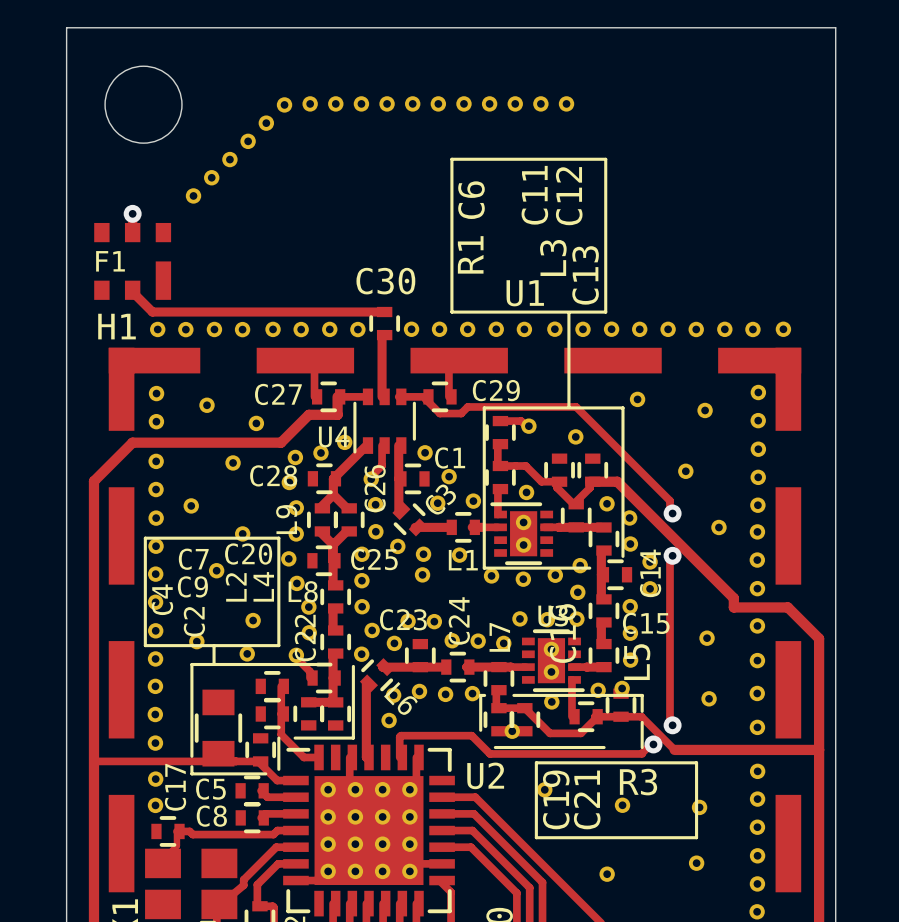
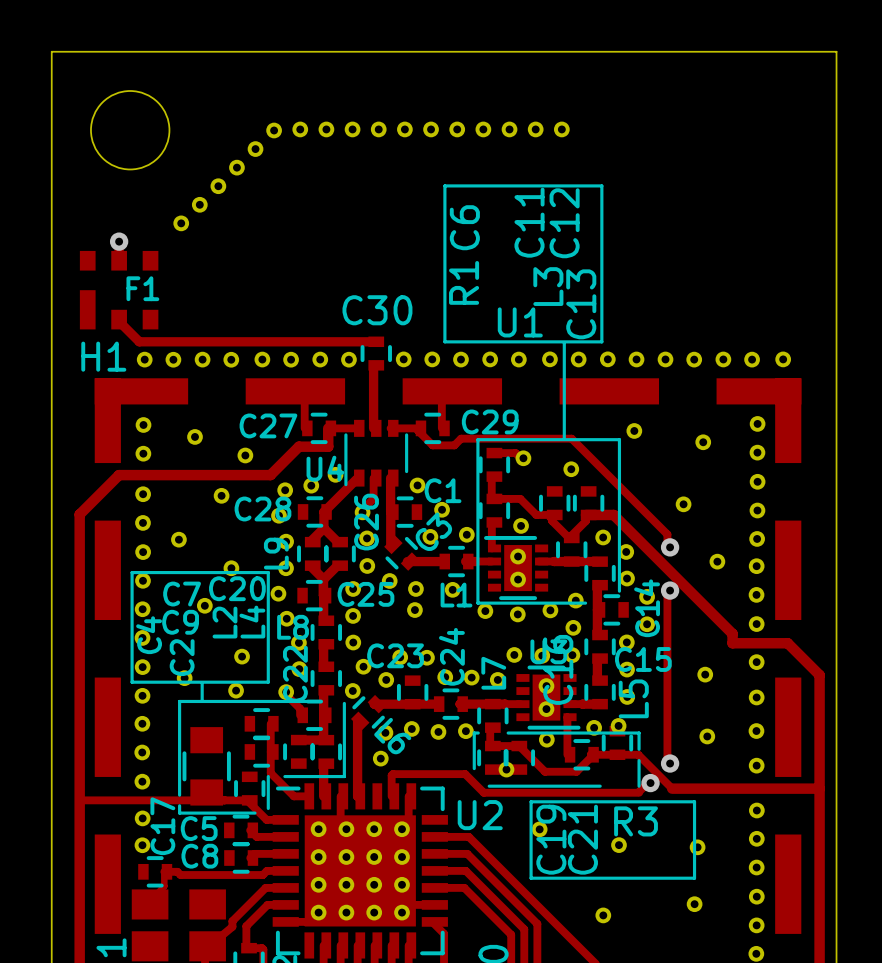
F1 footprint: [94, 222, 172, 300] -> [79, 250, 159, 330]
F1 name position: F1 (110, 261) -> F1 (142, 288)
track: none -> (326, 763) (323, 766) (323, 796)

